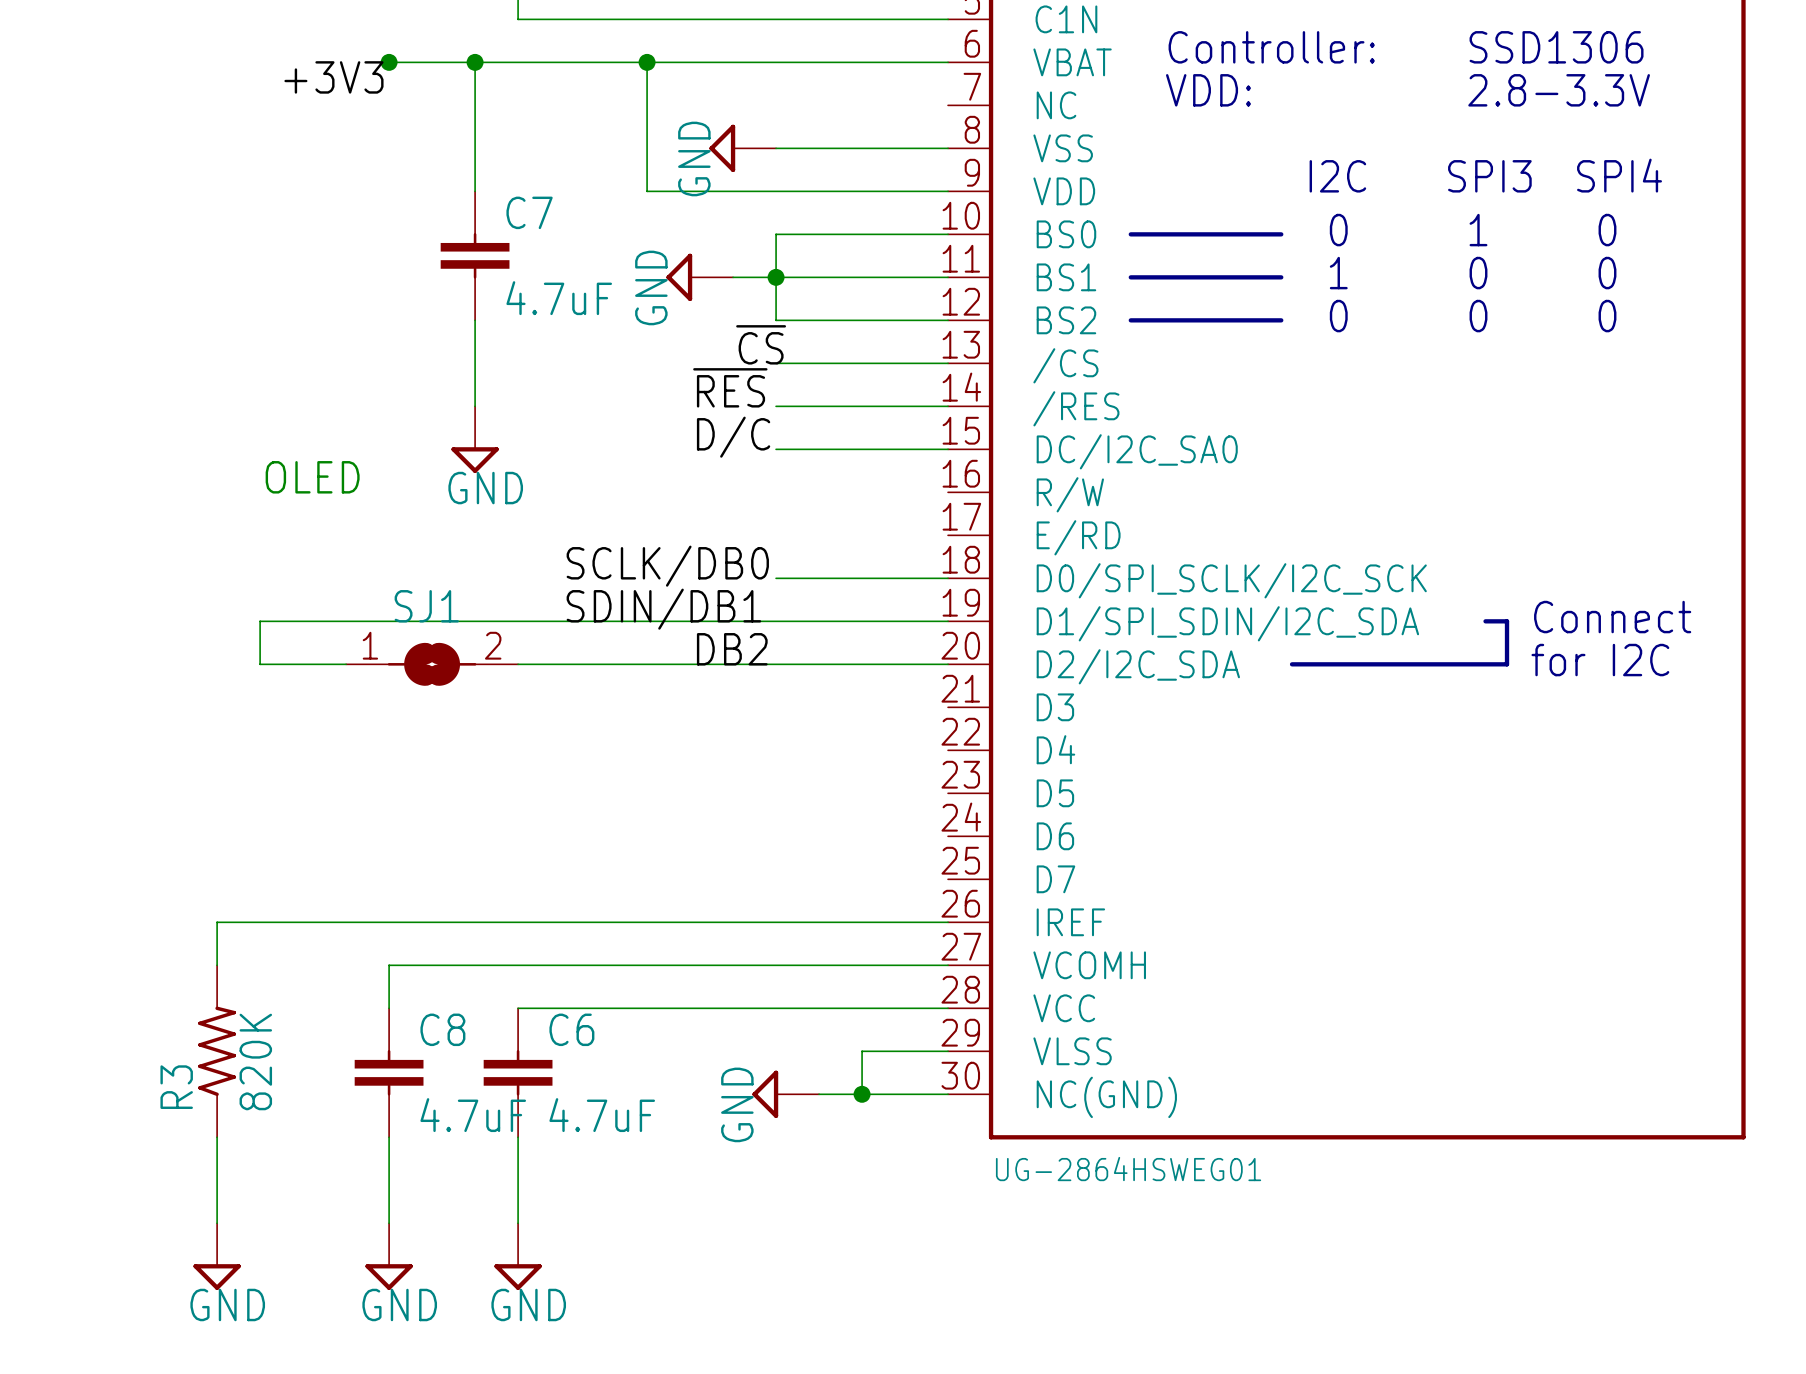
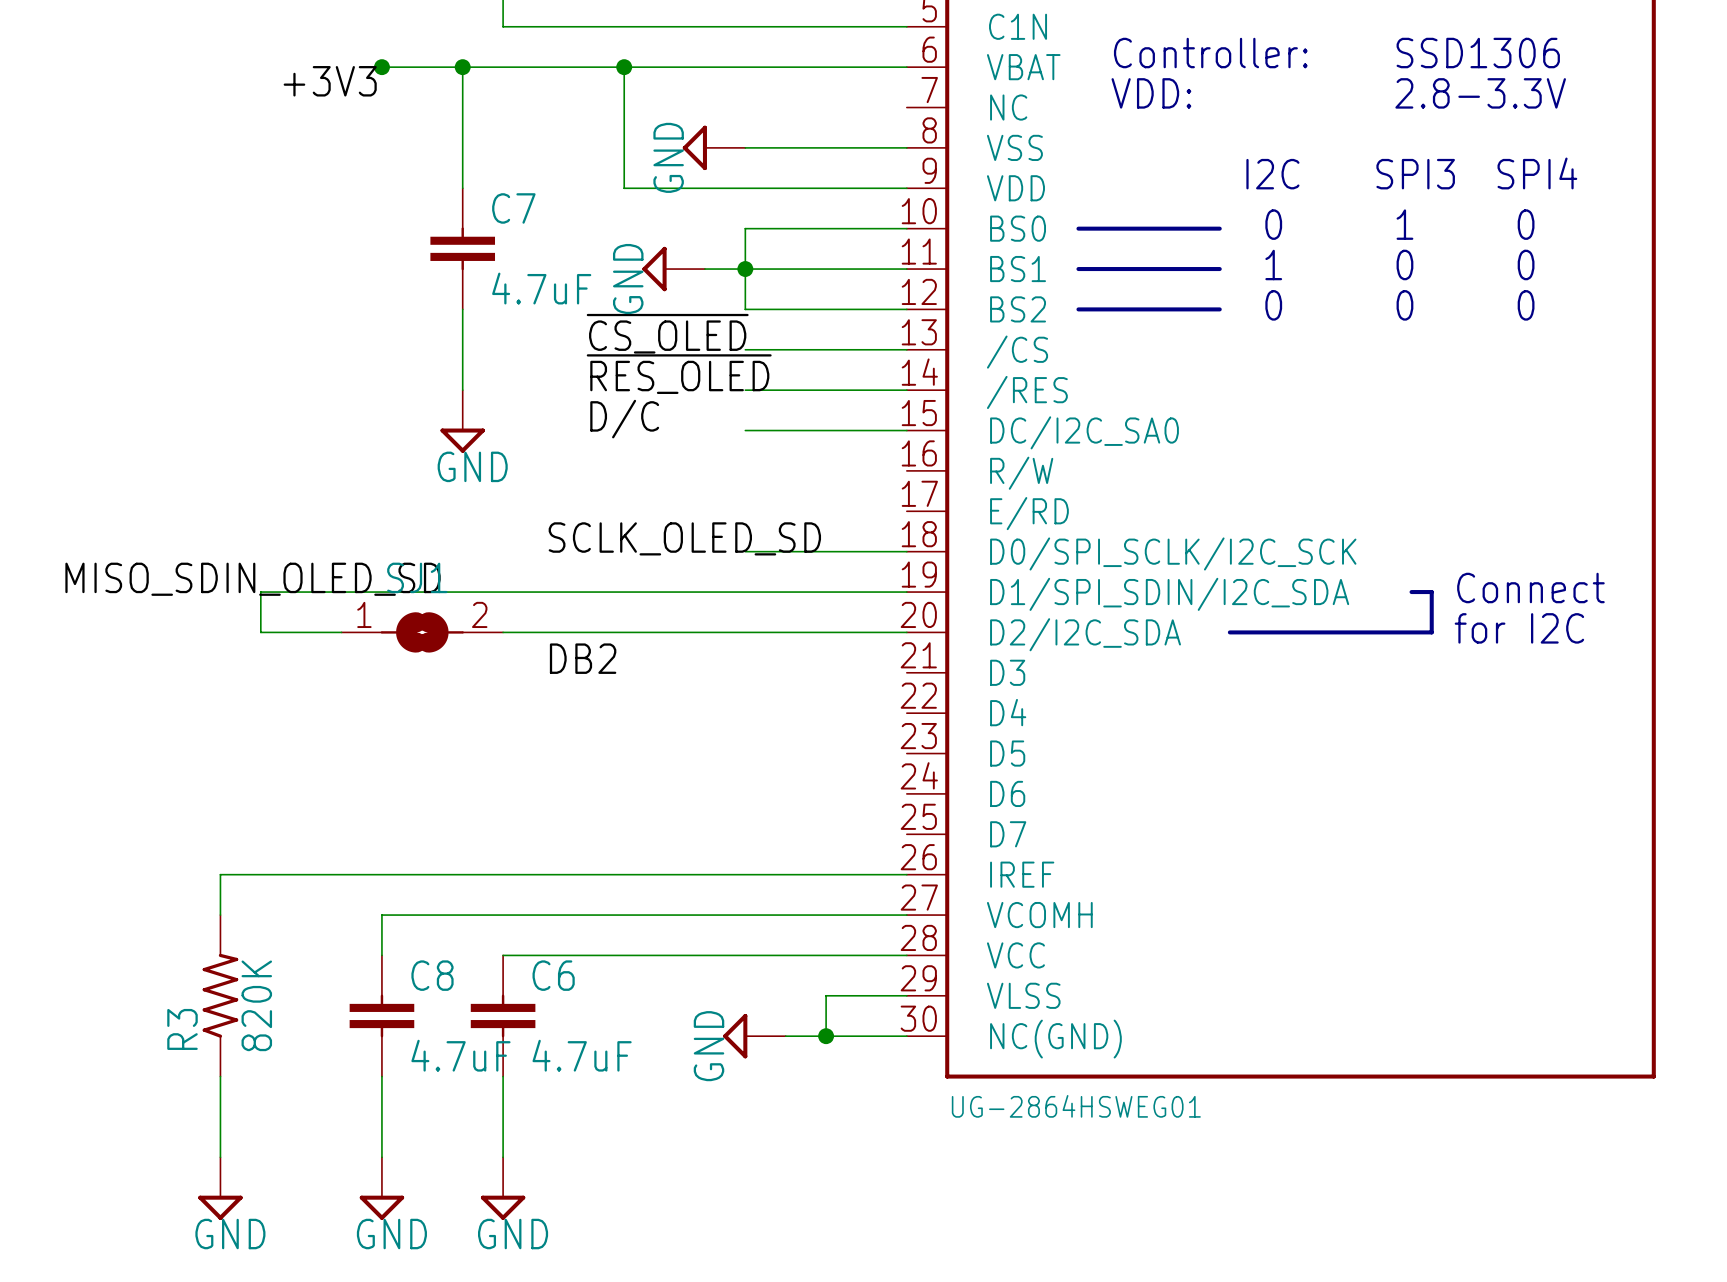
label: ~{CS} (761, 344) -> ~{CS_OLED} (667, 333)
label: ~{RES} (730, 387) -> ~{RES_OLED} (679, 374)
label position: D/C (733, 437) -> D/C (624, 419)
text: OLED (312, 477) -> none
label: SCLK/DB0 (667, 566) -> SCLK_OLED_SD (684, 538)
label: none -> MISO_SDIN_OLED_SD (253, 579)
label: SDIN/DB1 (663, 609) -> none
label position: DB2 (732, 649) -> DB2 (583, 658)

